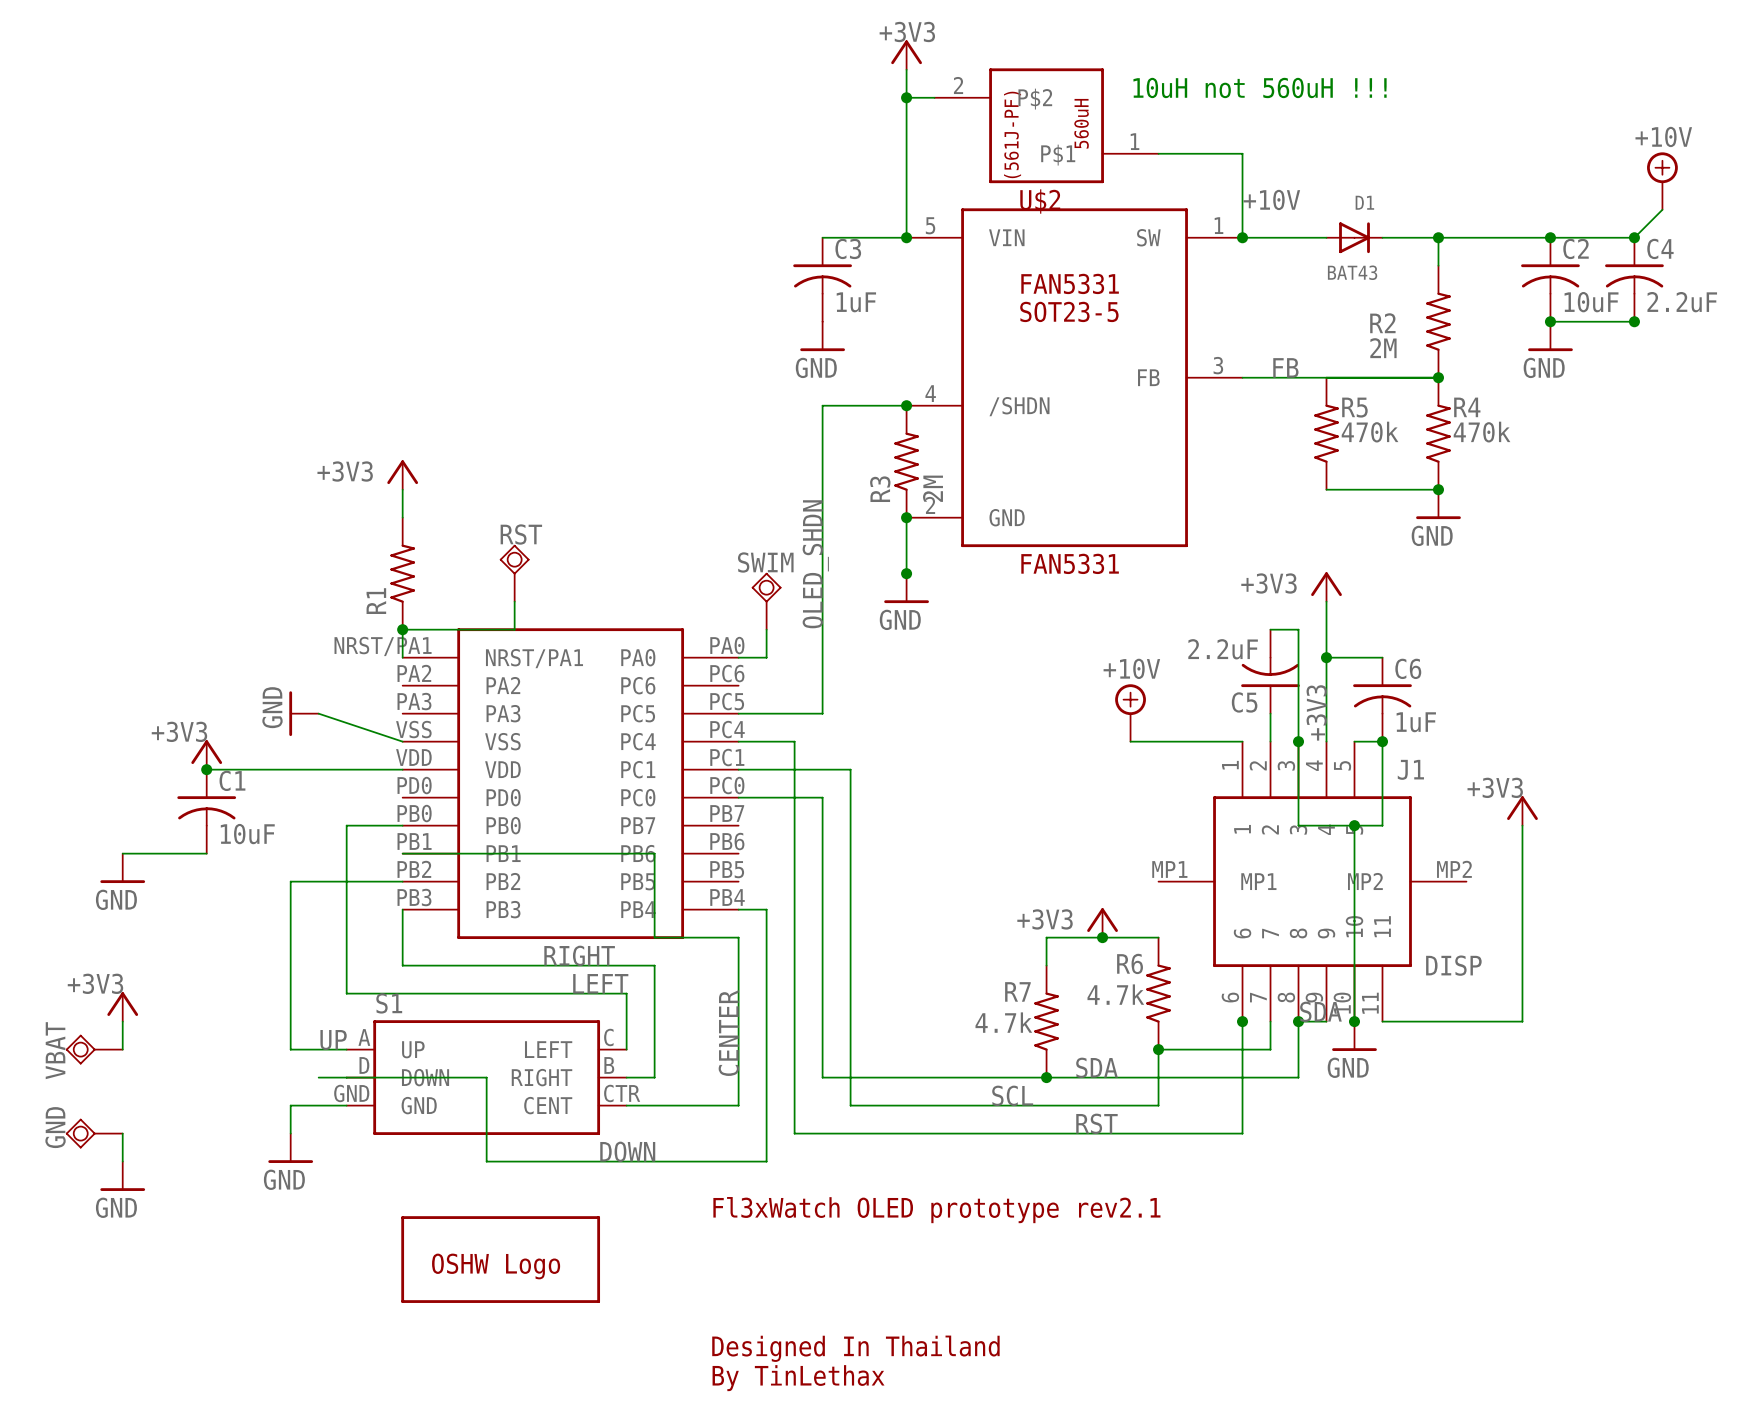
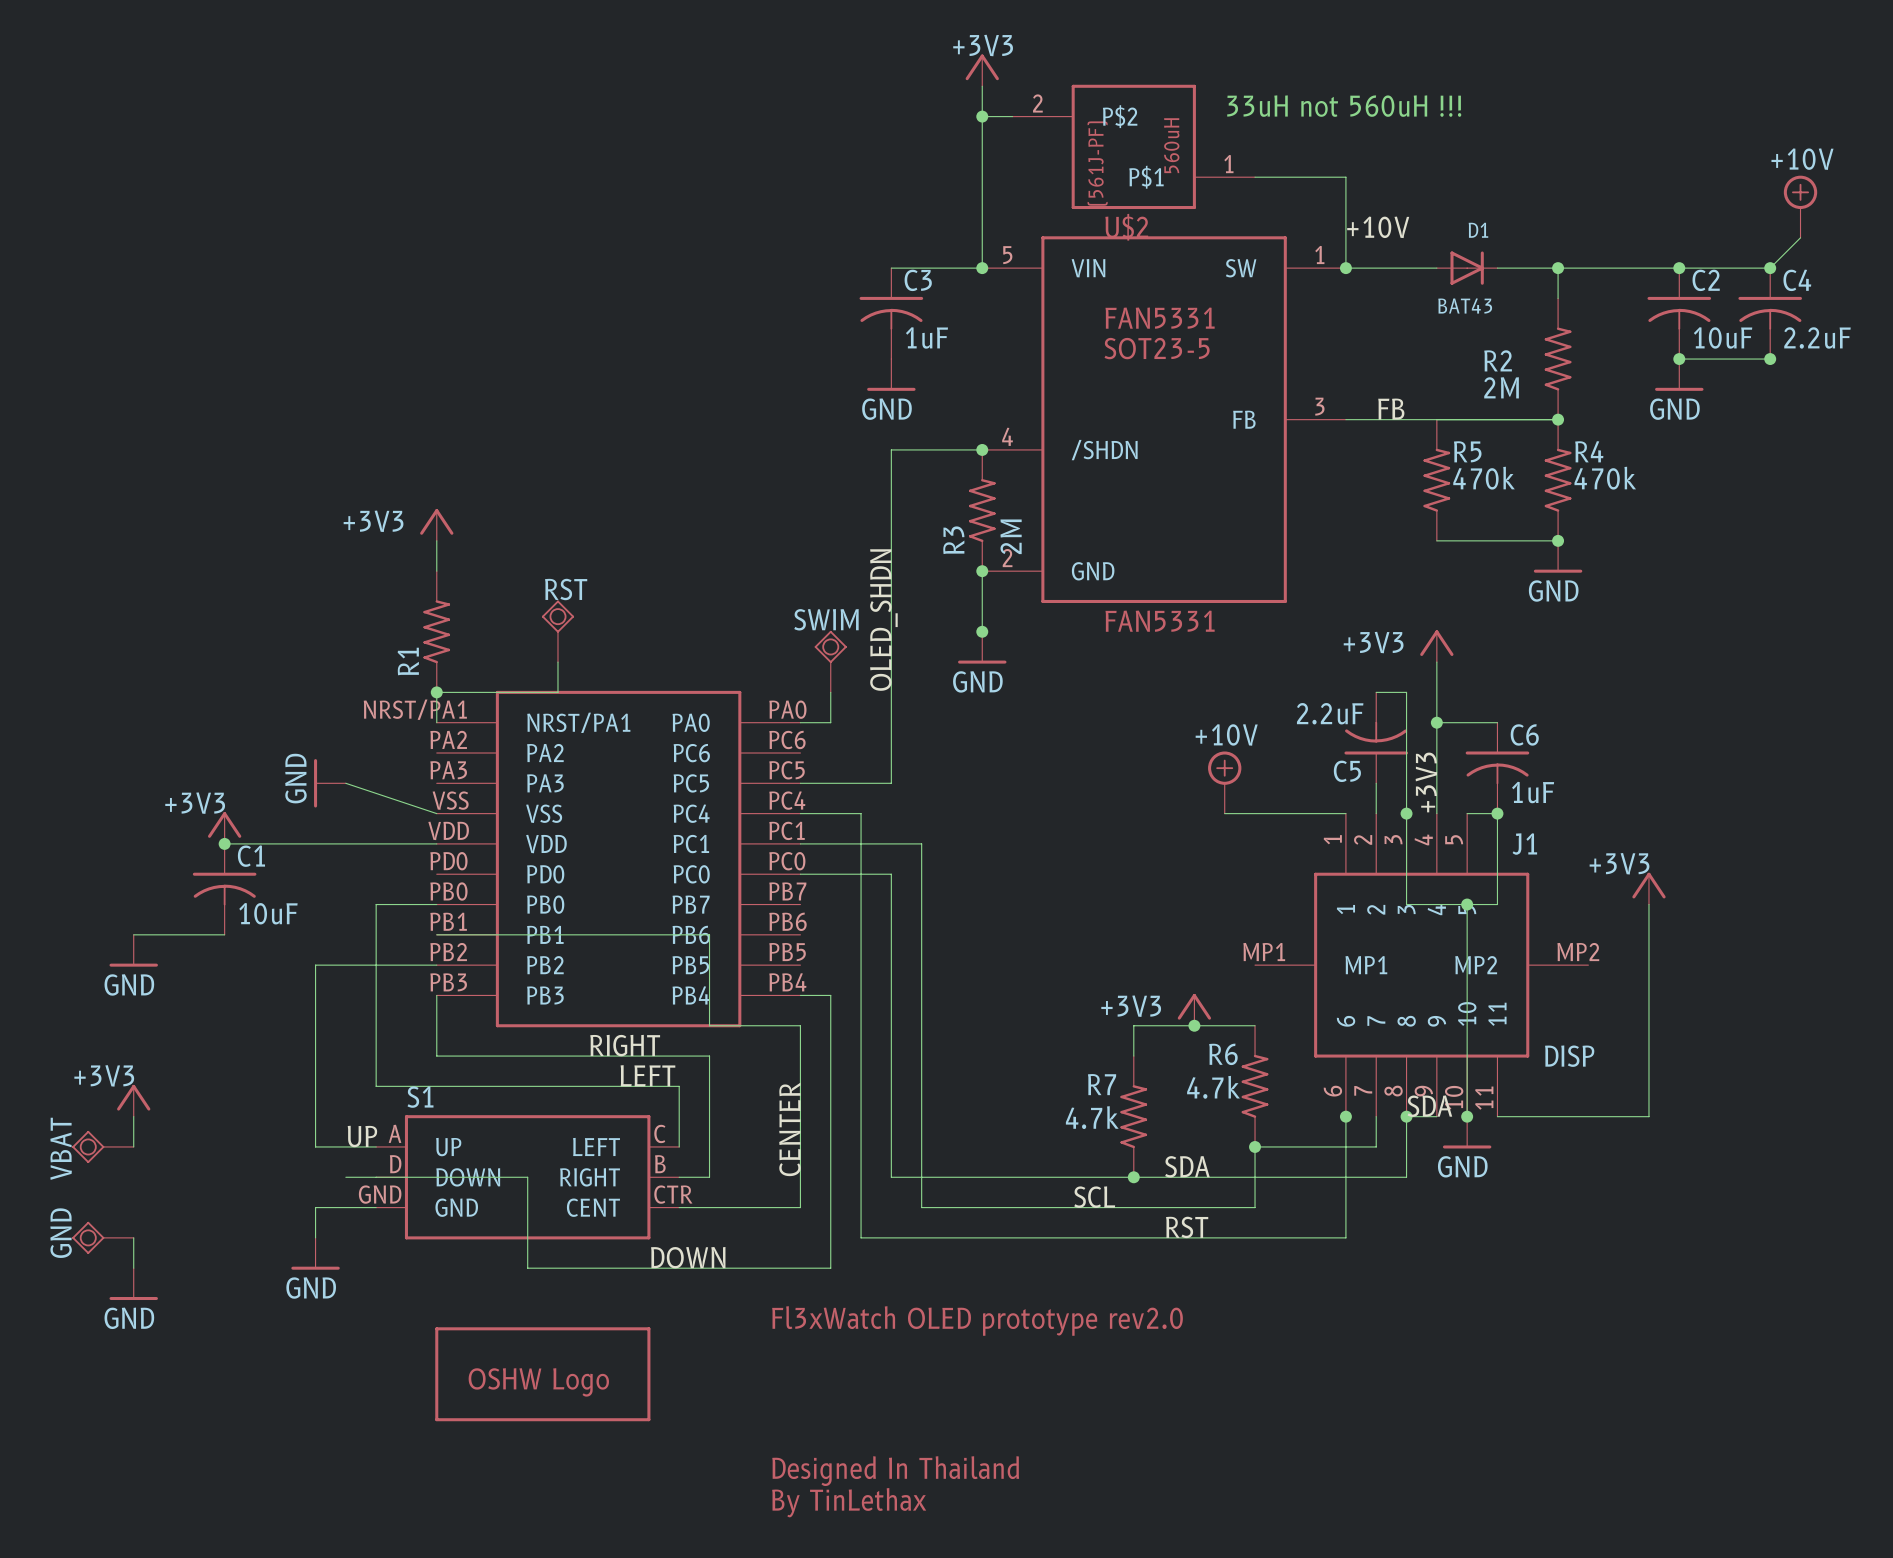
text: 10uH not 560uH !!! (1260, 87) -> 33uH not 560uH !!! (1344, 106)
text: Fl3xWatch OLED prototype rev2.1 (936, 1210) -> Fl3xWatch OLED prototype rev2.0 (977, 1320)

